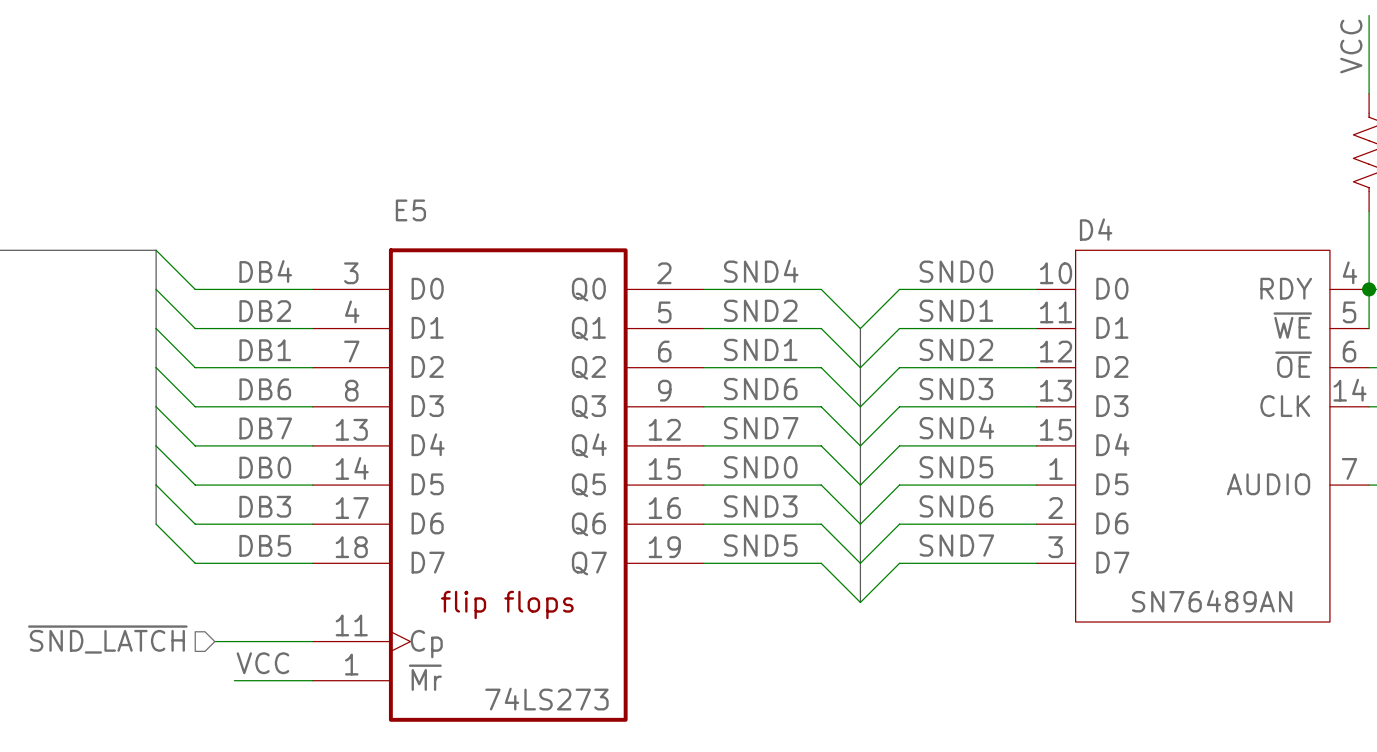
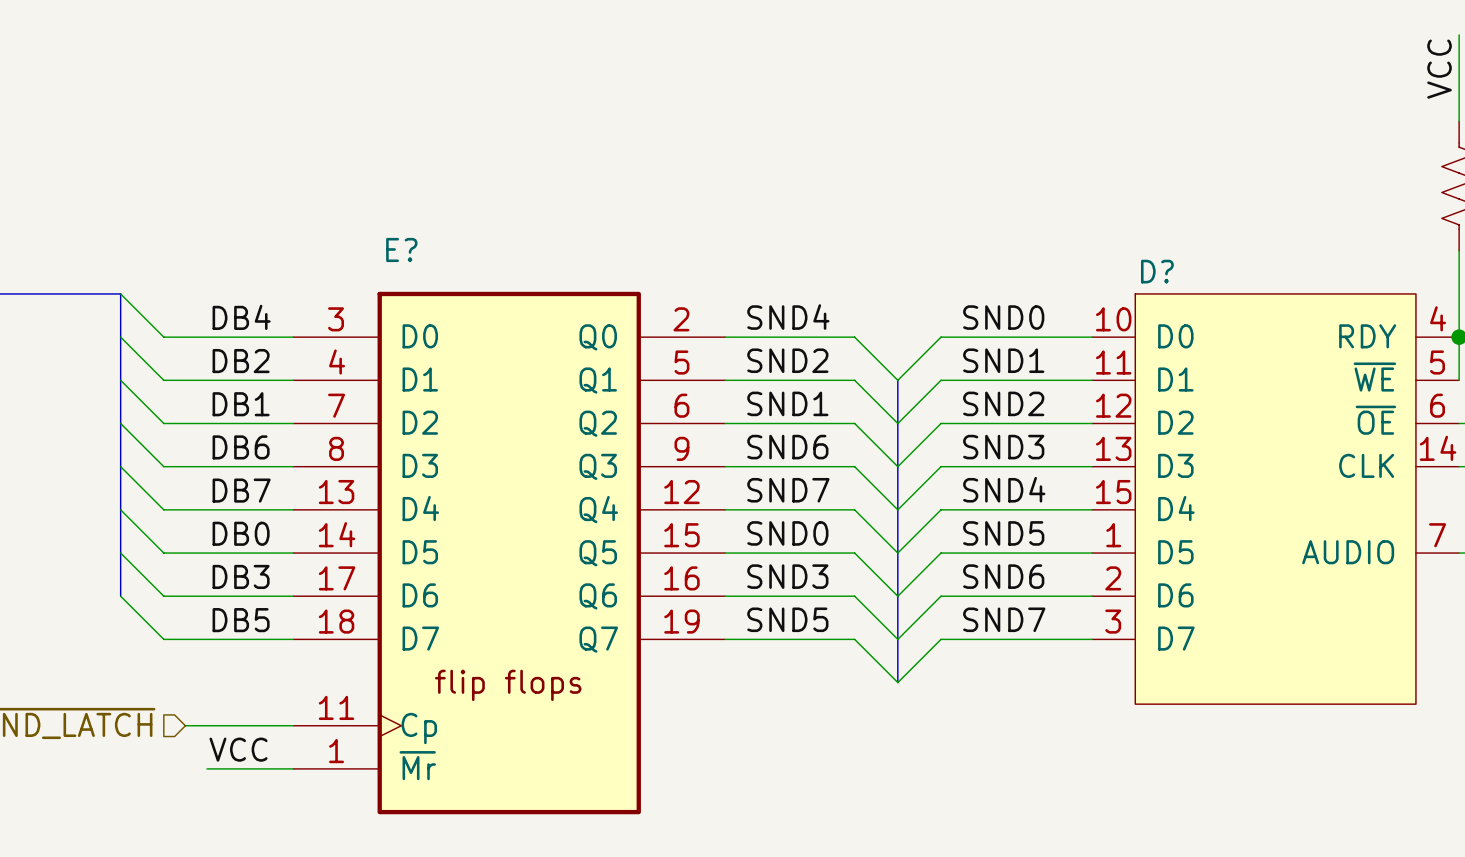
E5 name: E5 (410, 210) -> E? (401, 249)
D4 name: D4 (1096, 229) -> D? (1157, 271)
D4 value: SN76489AN (1212, 601) -> none
E5 value: 74LS273 (546, 699) -> none

